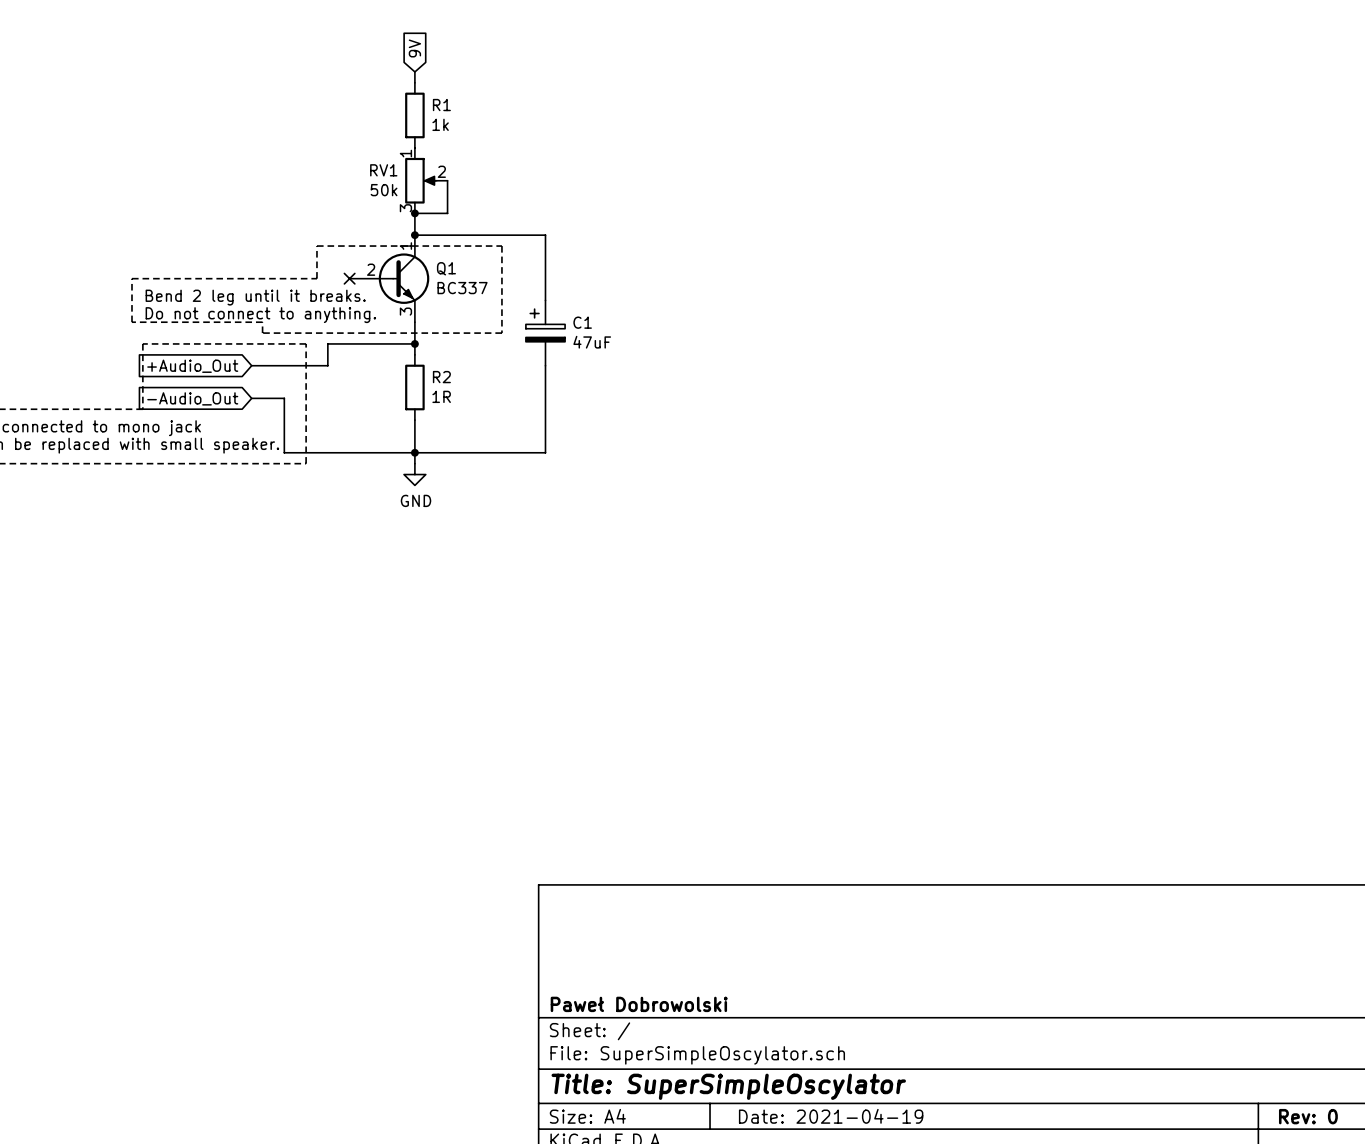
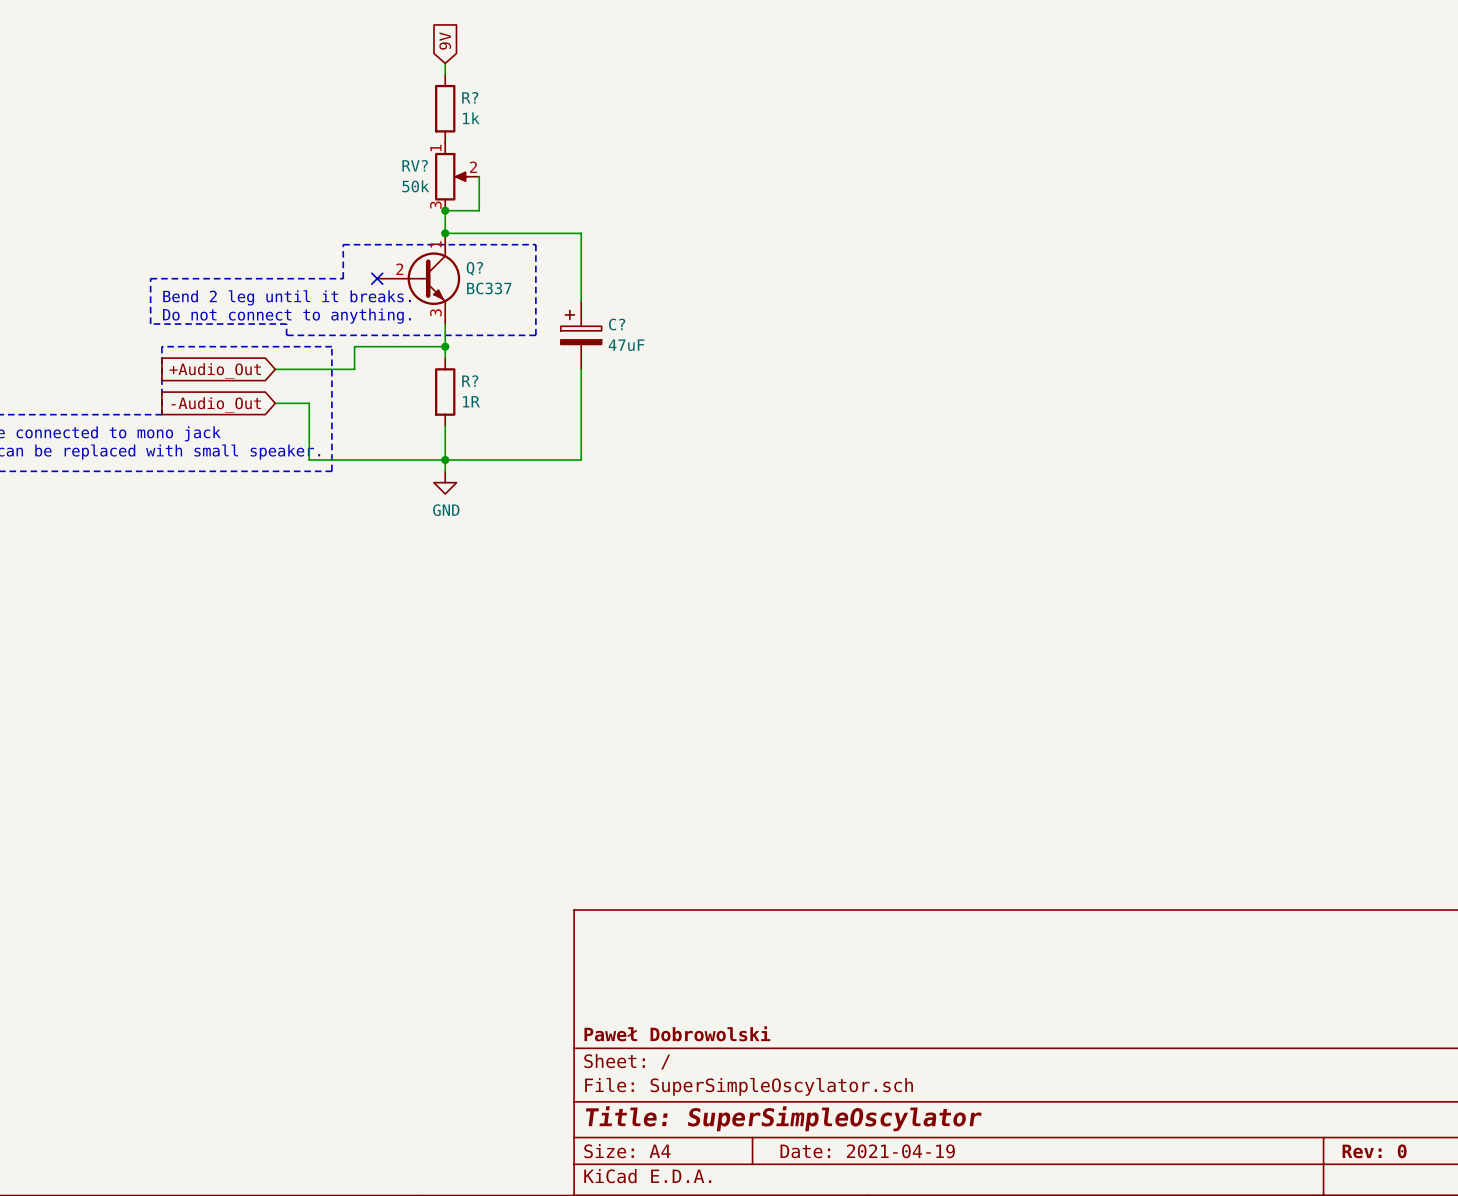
R1 name: R1 (441, 105) -> R? (470, 97)
RV1 name: RV1 (383, 170) -> RV? (415, 165)
Q1 name: Q1 (446, 268) -> Q? (474, 268)
C1 name: C1 (582, 322) -> C? (617, 324)
R2 name: R2 (441, 377) -> R? (470, 381)

